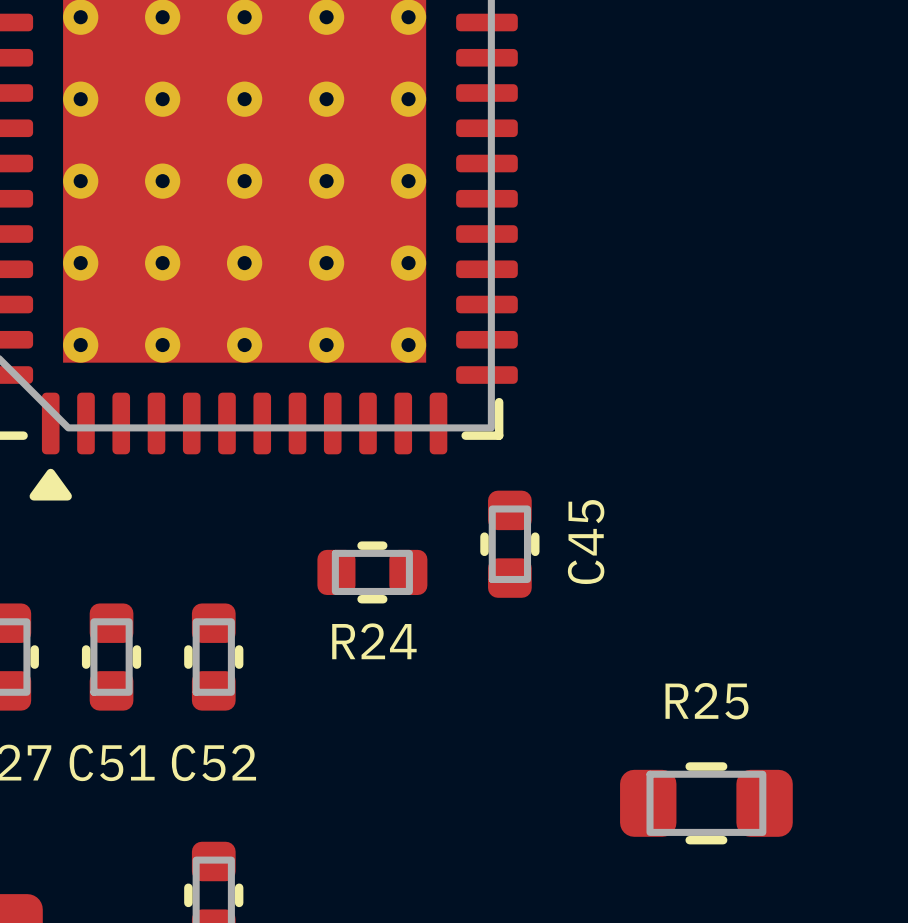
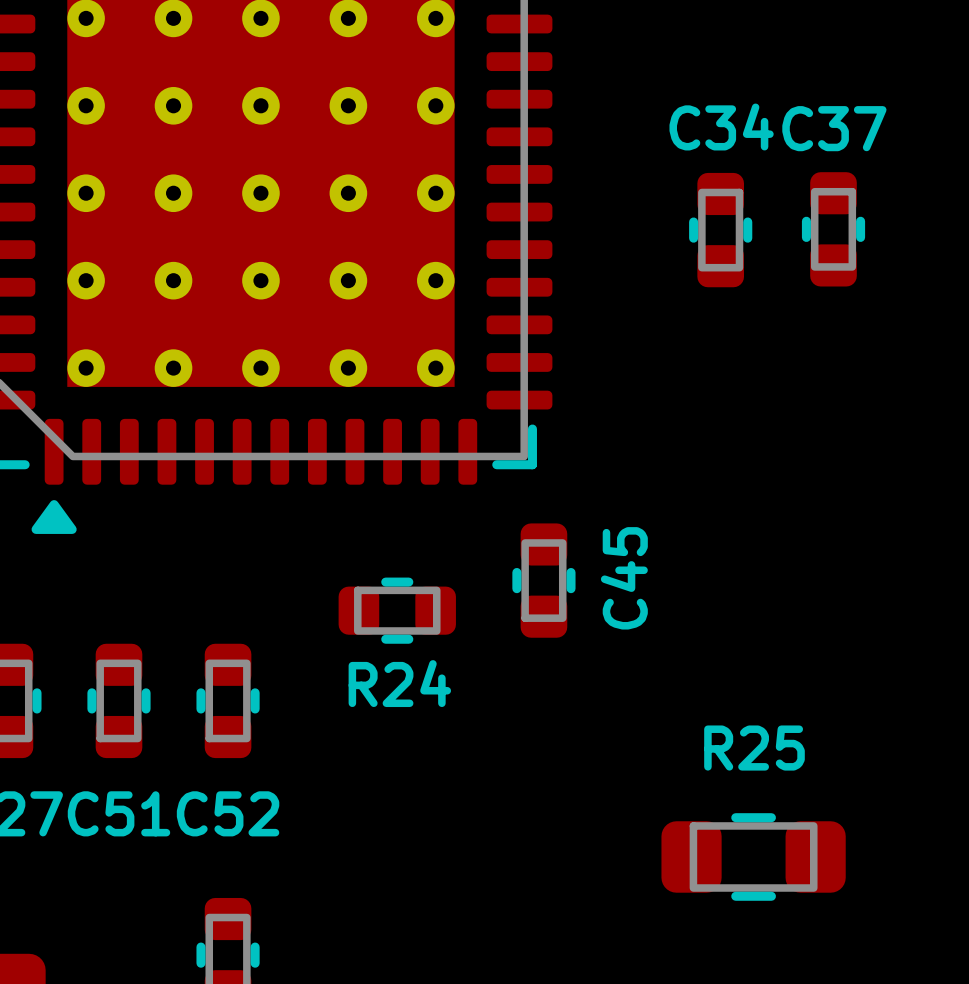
C37: none -> (833, 229)
C34: none -> (720, 230)

